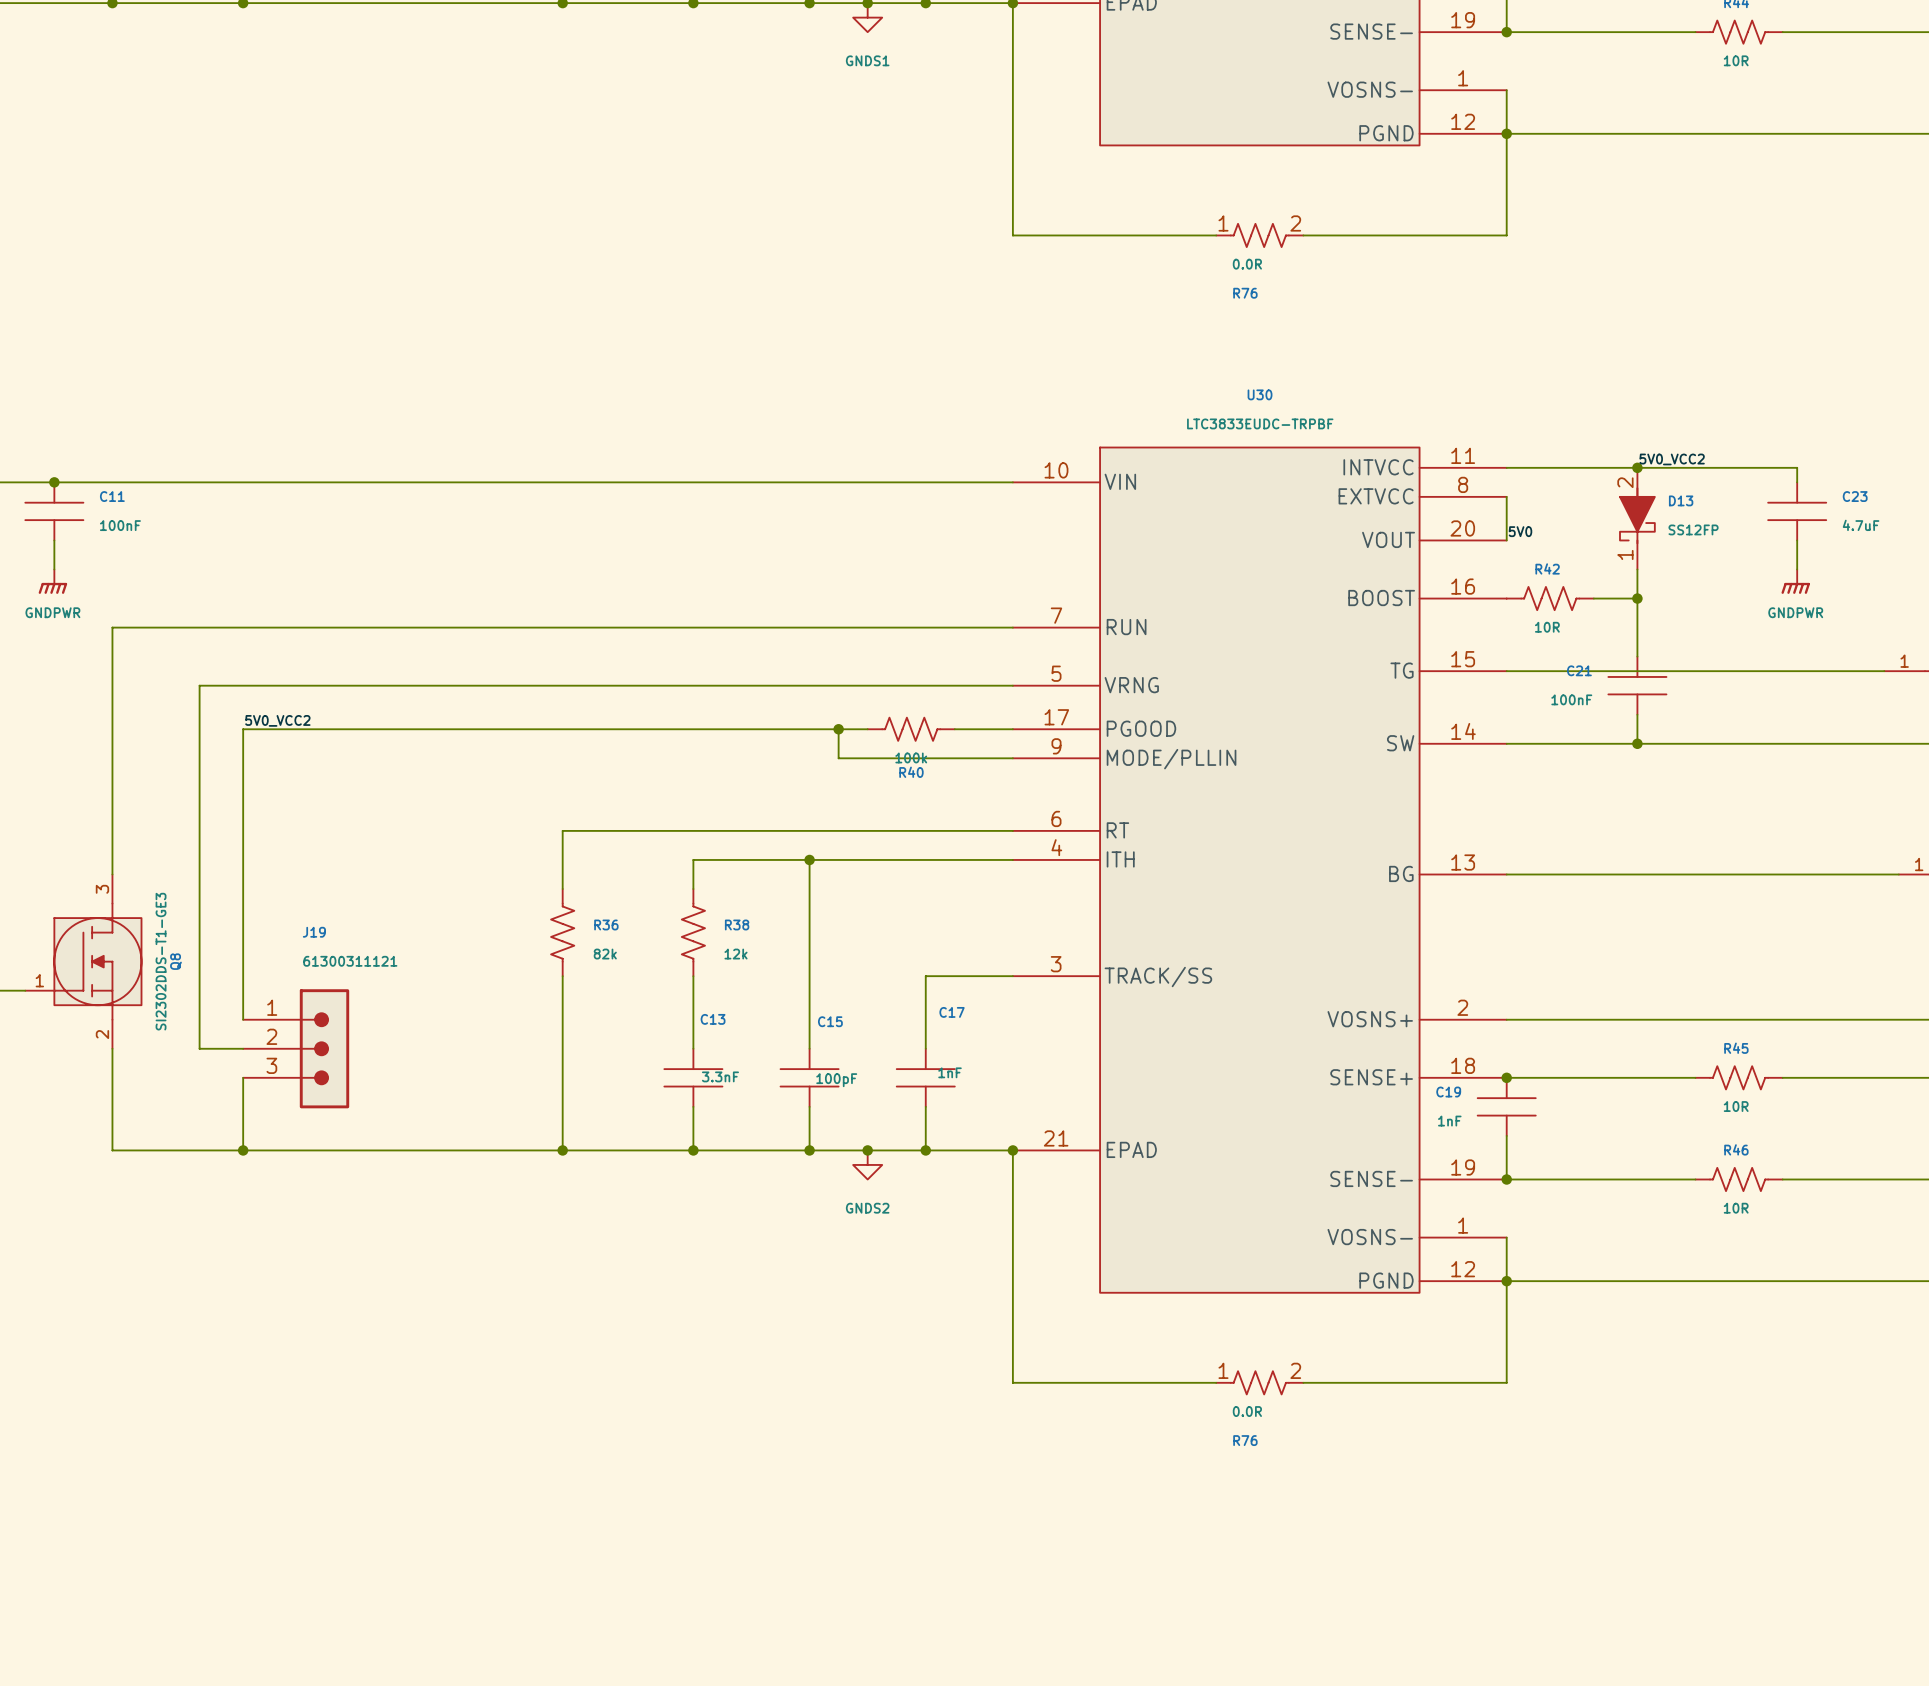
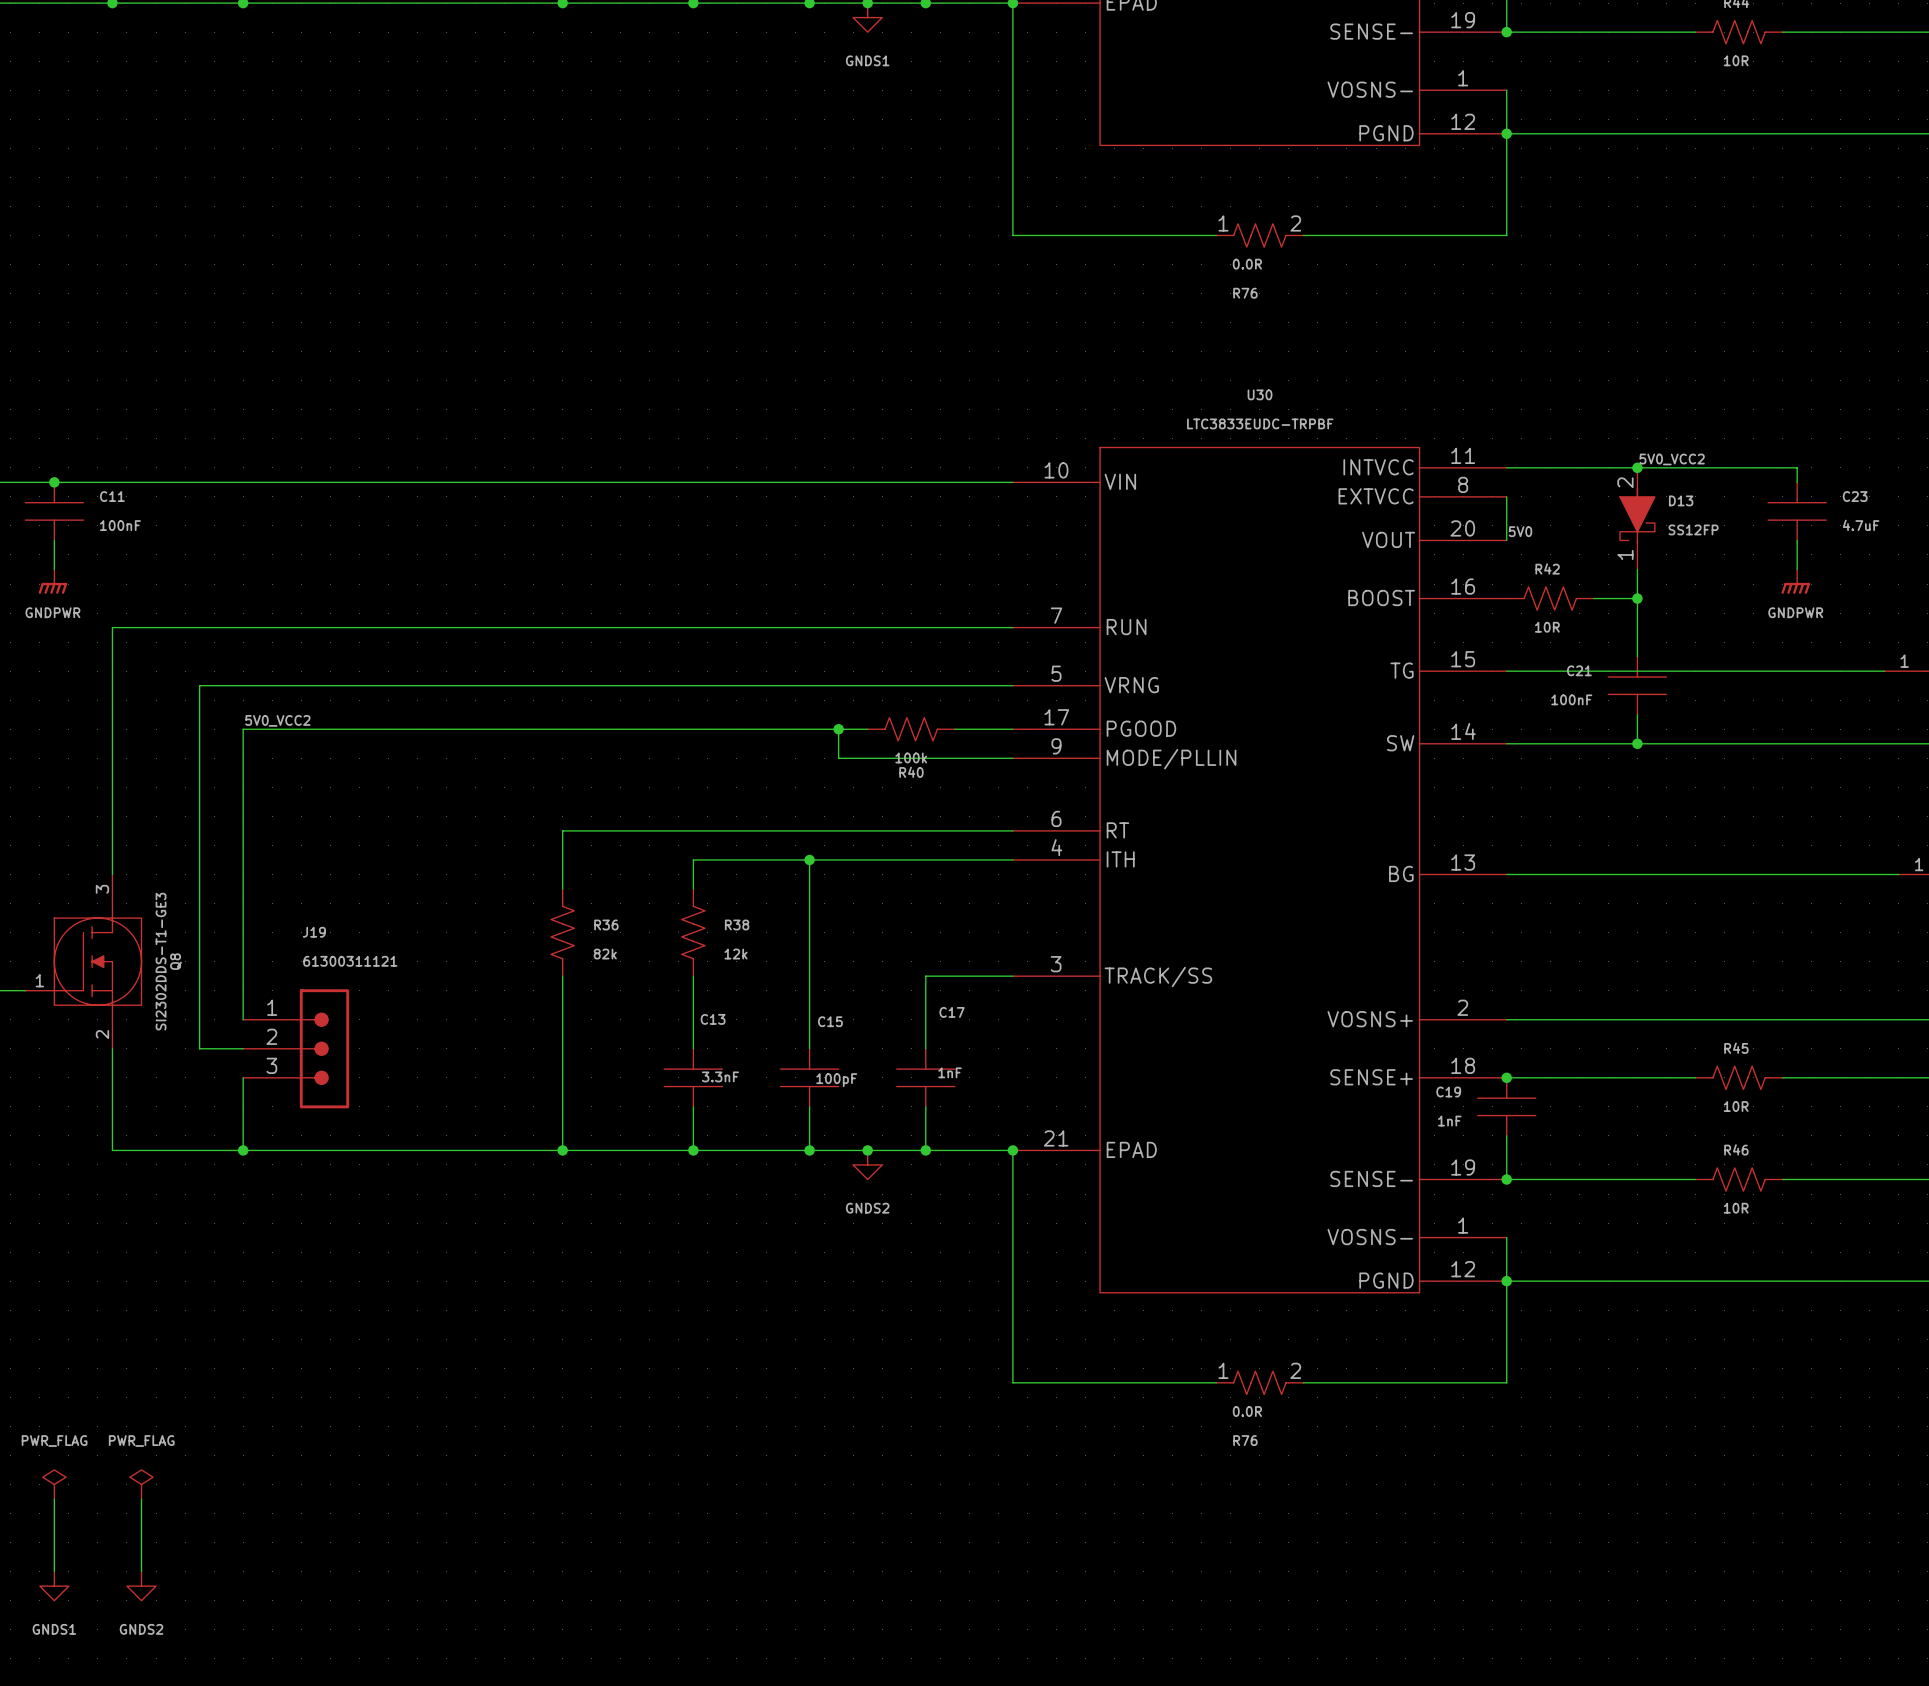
power symbol: none -> PWR_FLAG (54, 1484)
power symbol: none -> PWR_FLAG (141, 1484)
wire: none -> (54, 1499) (54, 1571)
wire: none -> (141, 1499) (141, 1571)
power symbol: none -> GNDS1 (54, 1586)
power symbol: none -> GNDS2 (141, 1586)

